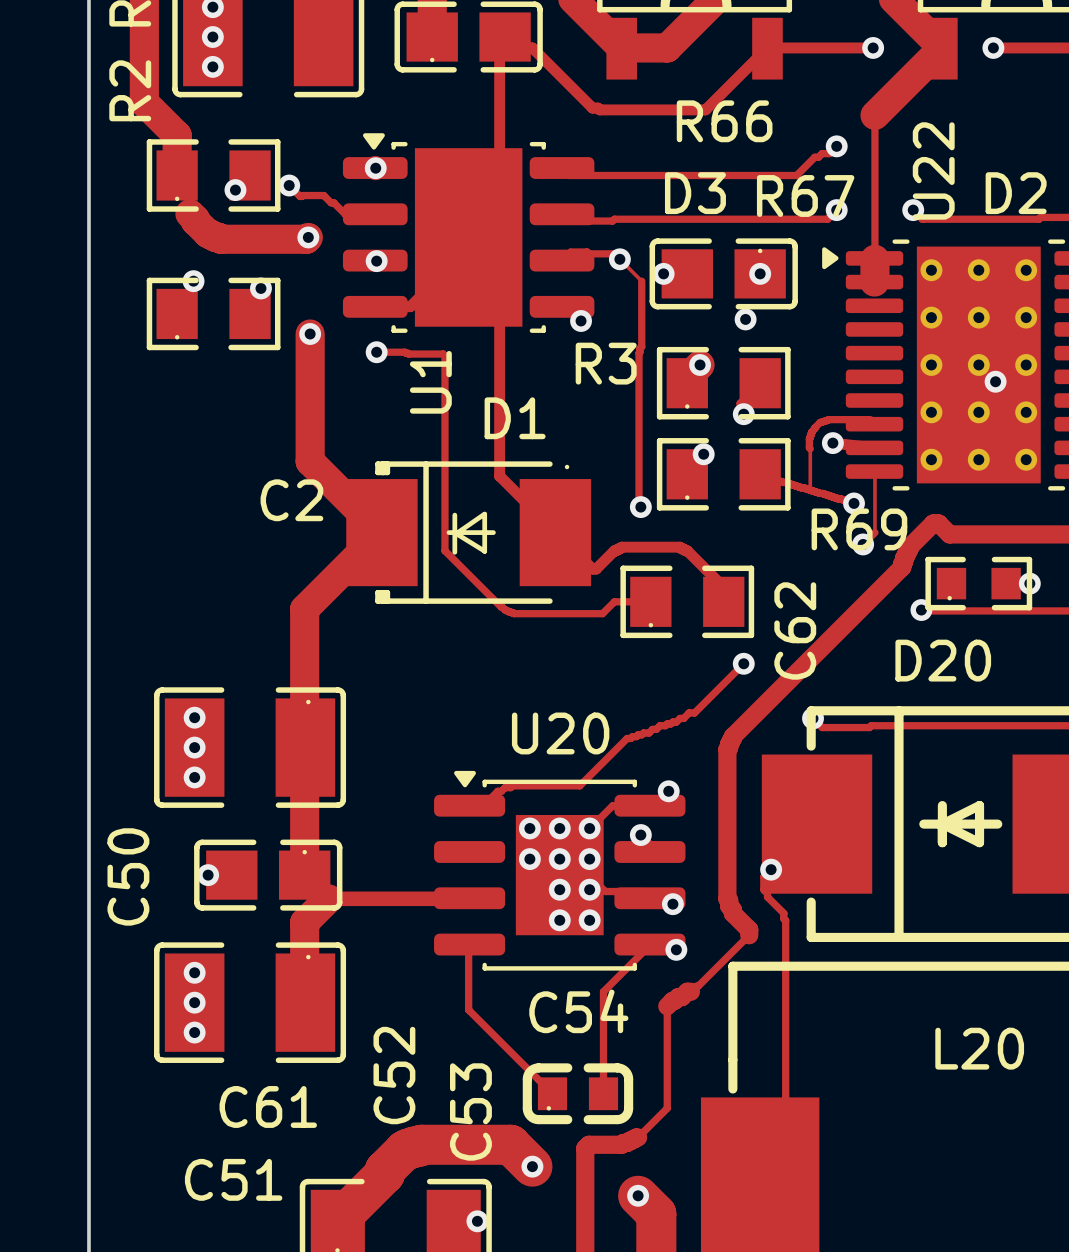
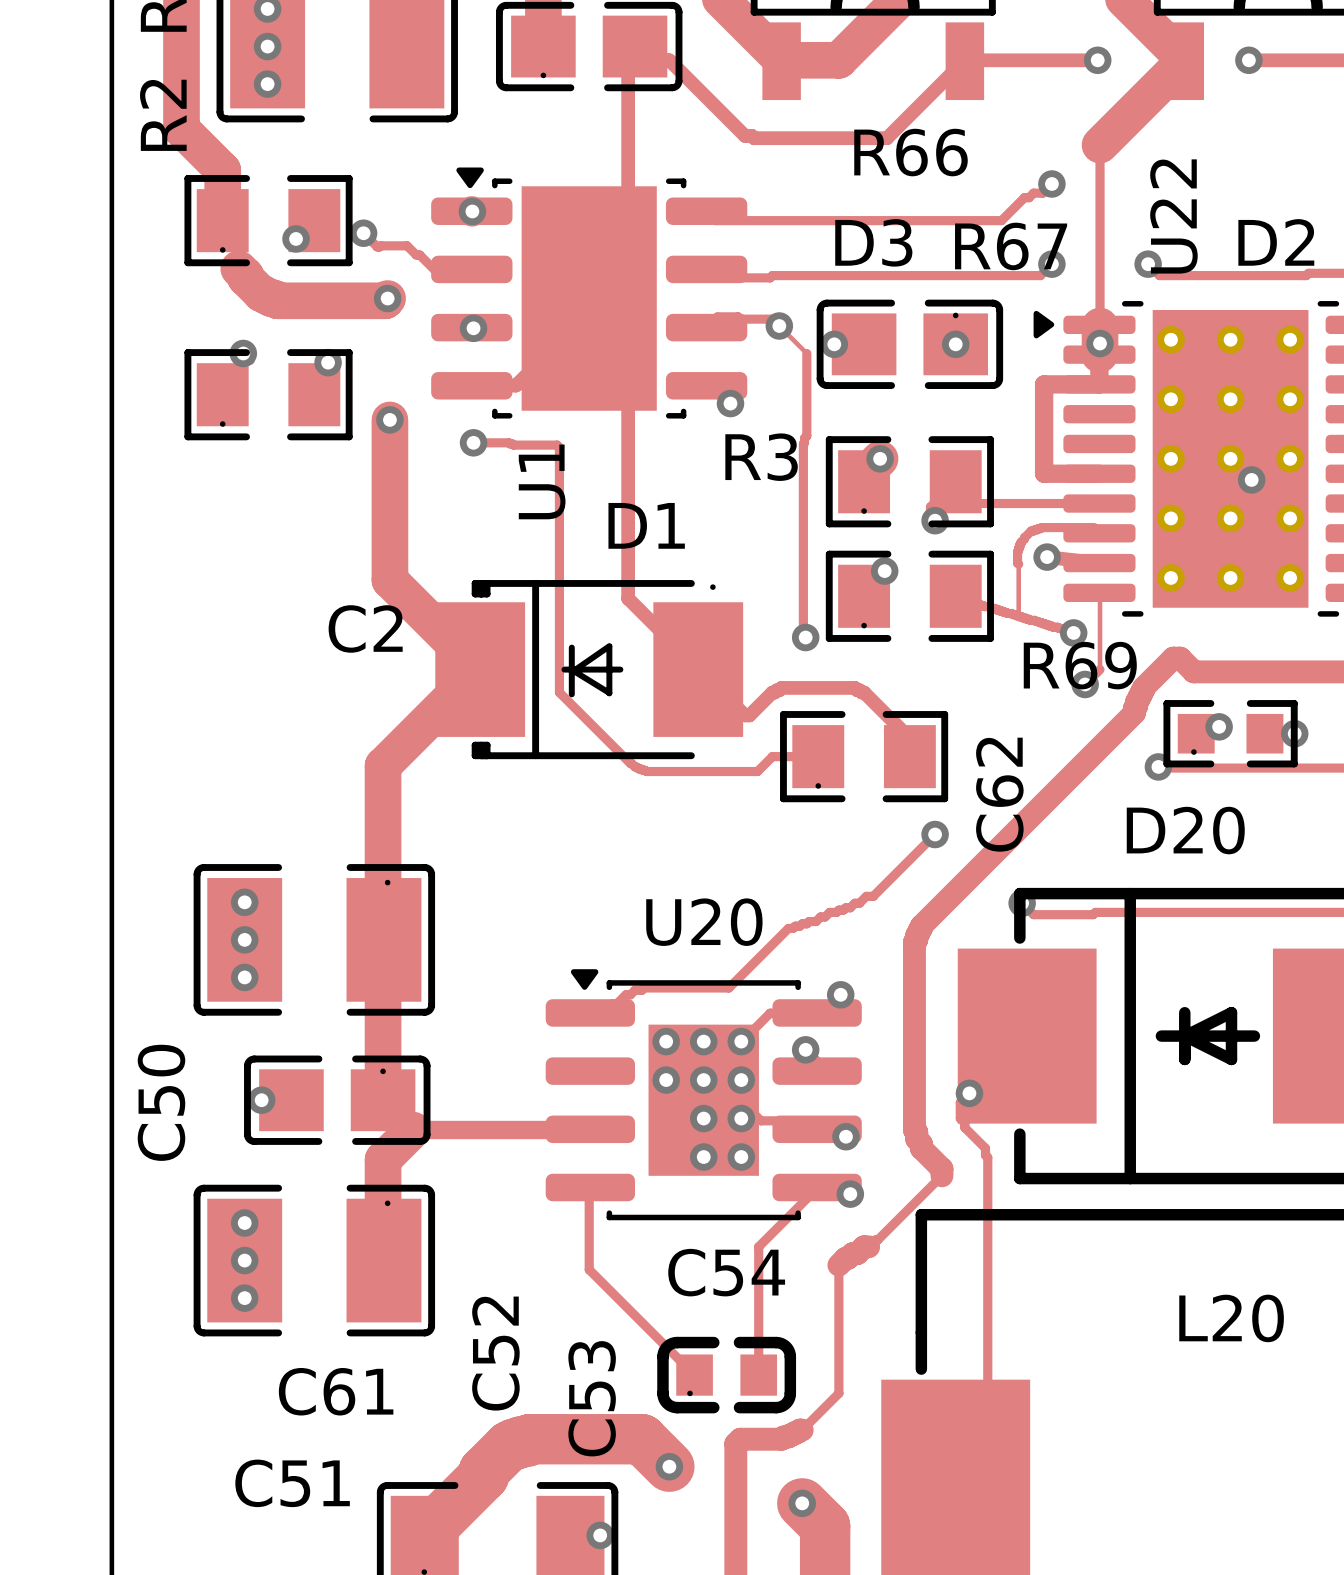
track: none -> (1099, 354) (1099, 384) (1044, 384) (1044, 473) (1099, 473)
via position: (745, 319) -> (1100, 343)
track: none -> (955, 481) (978, 503) (1099, 503)
via: none -> (1219, 726)

